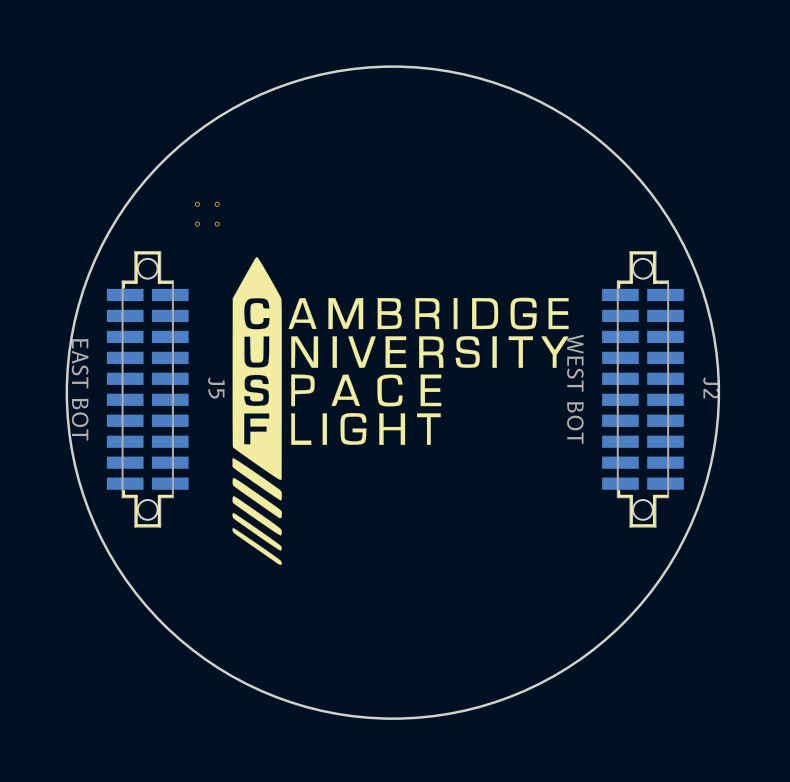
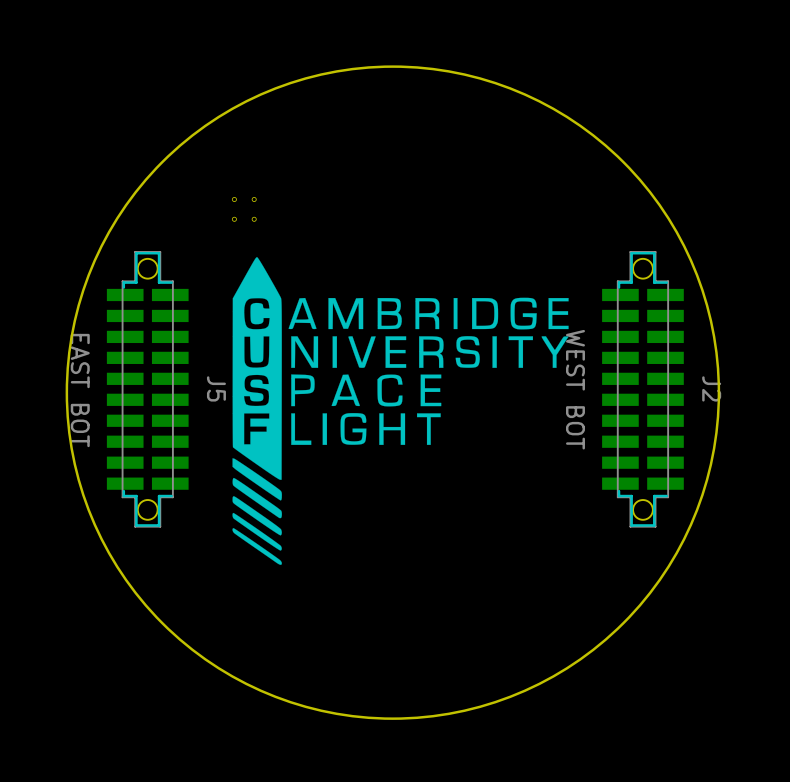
part position: (207, 214) -> (244, 209)

